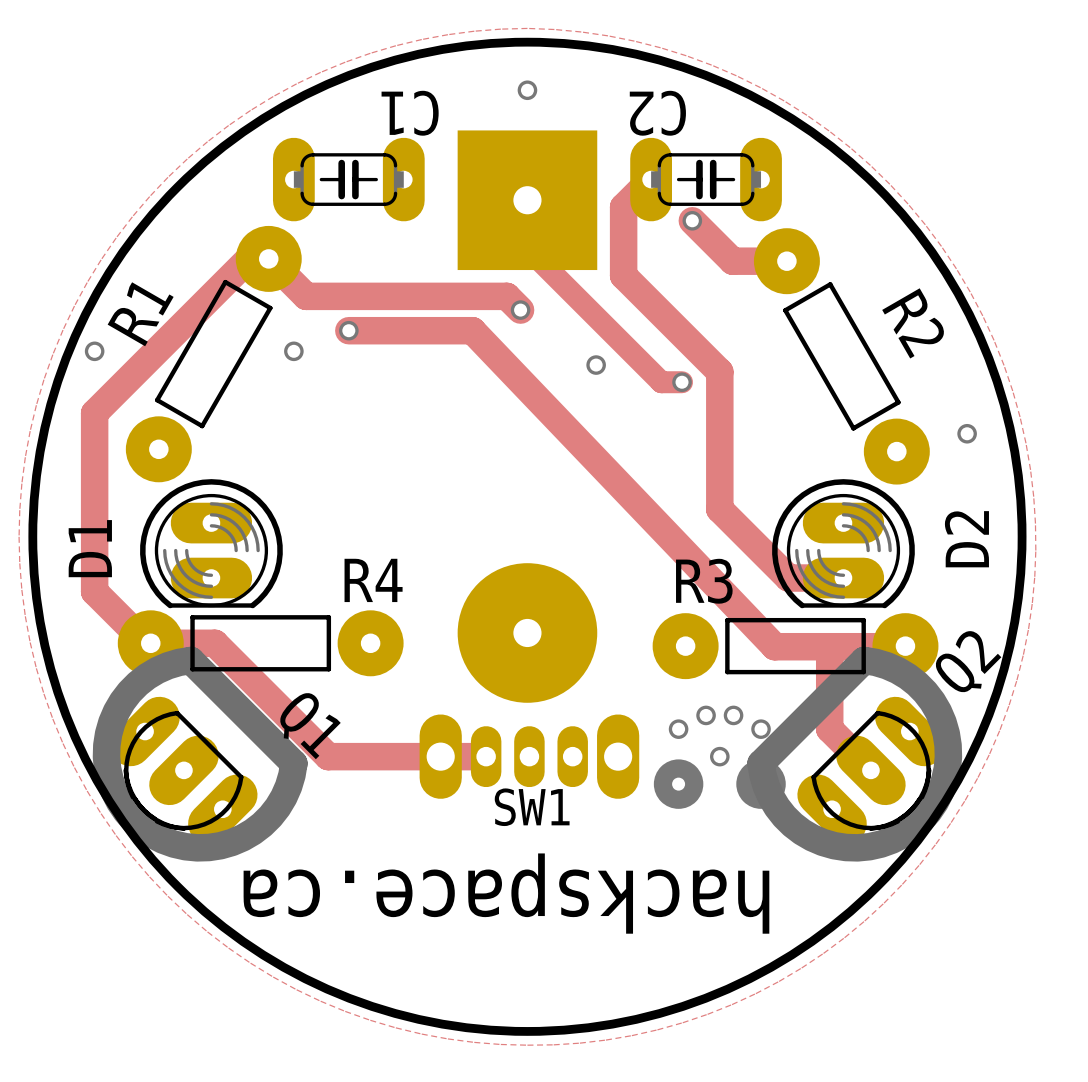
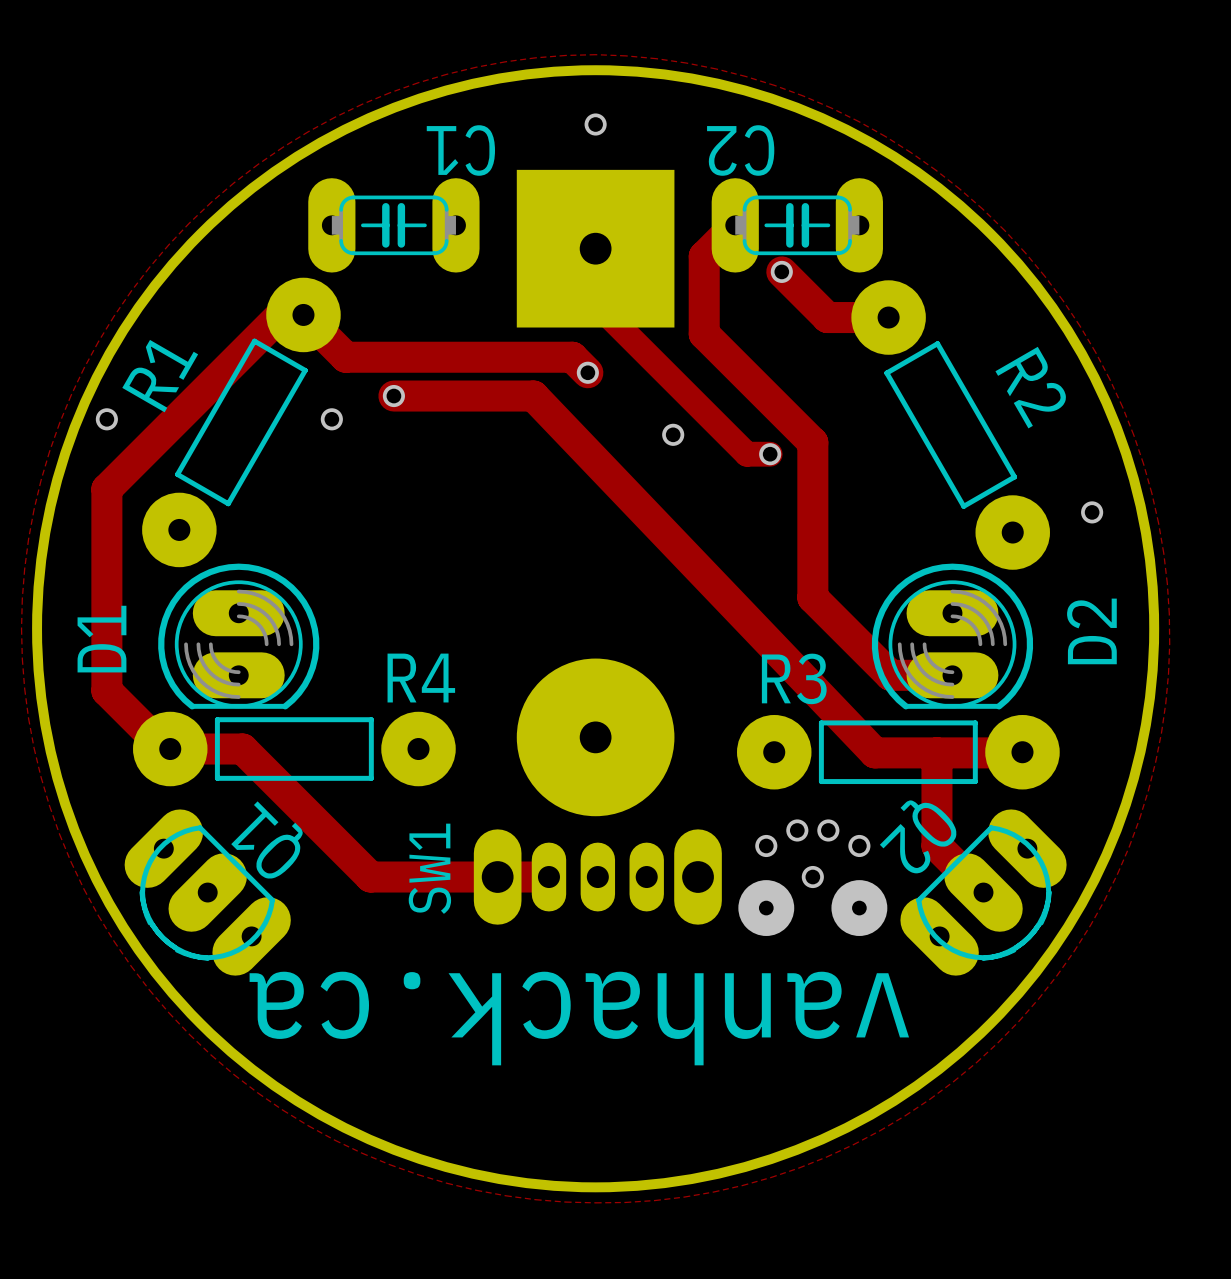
line: (190, 660) (293, 763) (283, 797) (262, 824) (231, 842) (208, 847) (185, 846) (162, 840) (133, 820) (114, 791) (106, 757) (111, 722) (129, 692) (157, 670) (190, 660) -> none
line: (864, 660) (761, 763) (771, 797) (792, 824) (823, 842) (845, 847) (869, 846) (891, 840) (920, 820) (940, 791) (948, 757) (943, 722) (925, 692) (897, 670) (864, 660) -> none
Q2 name rotation: 0° (967, 662) -> 180° (918, 836)
Q2 name position: Q2 (967, 662) -> Q2 (918, 836)
Q1 name rotation: 0° (309, 725) -> 180° (267, 840)
SW1 name rotation: 0° (532, 807) -> 90° counterclockwise (429, 868)
SW1 name position: SW1 (532, 807) -> SW1 (429, 868)
text: hackspace.ca (506, 893) -> vanhack.ca (579, 1018)

